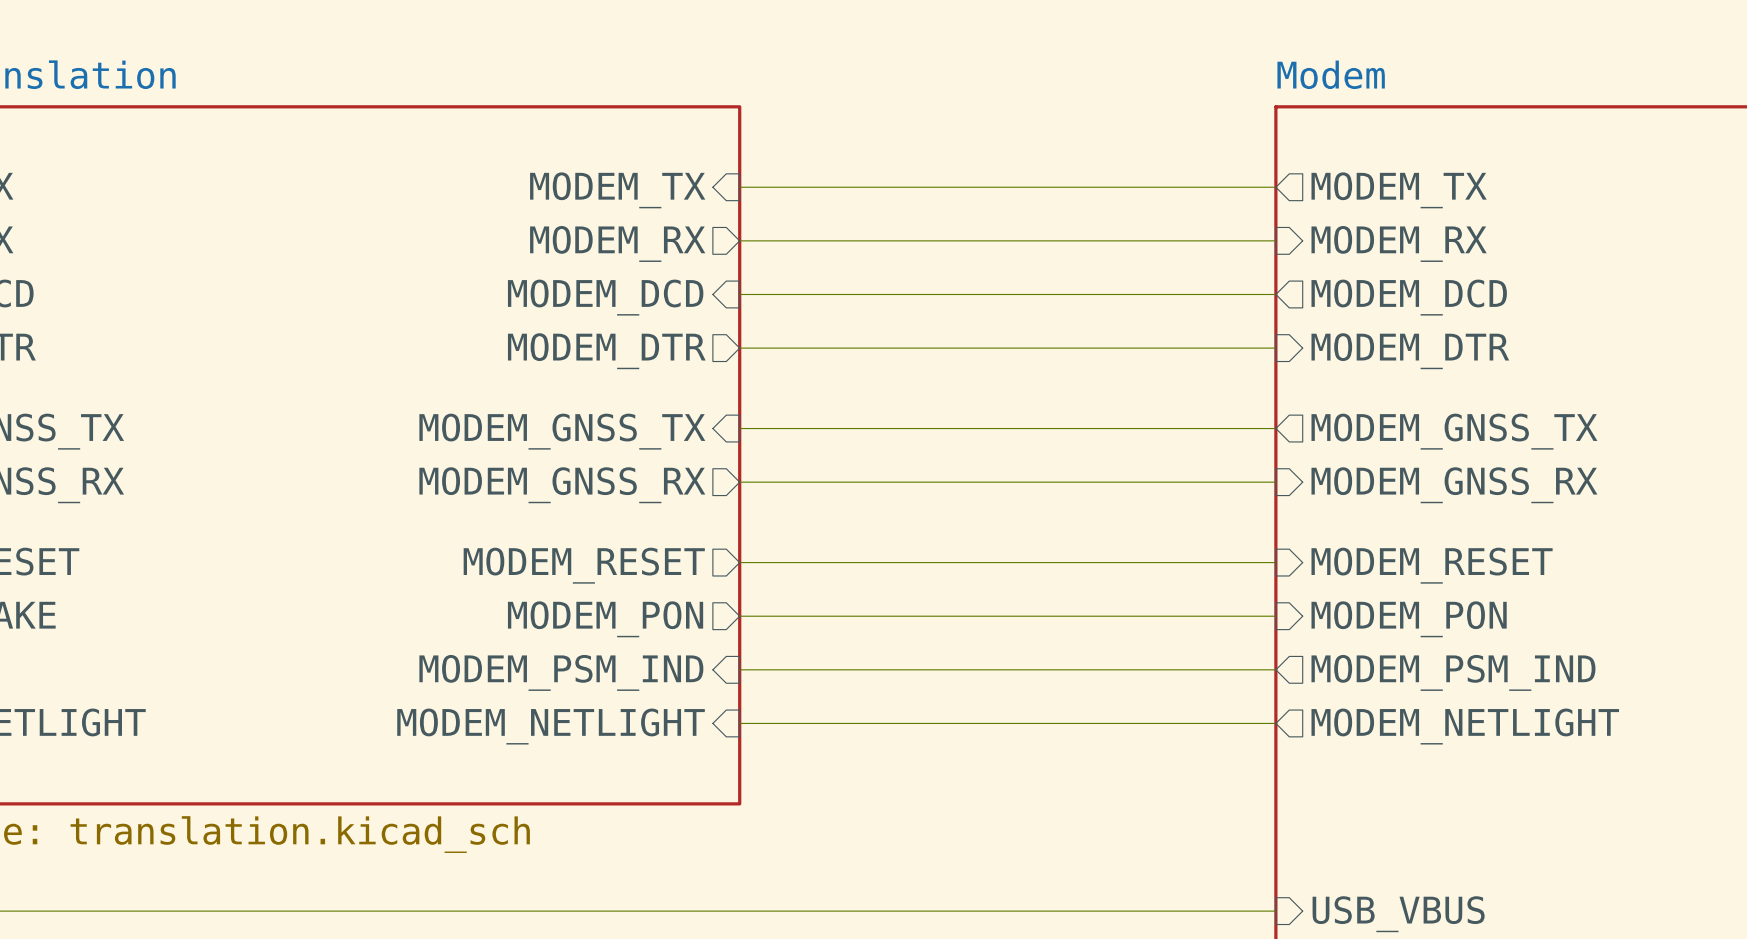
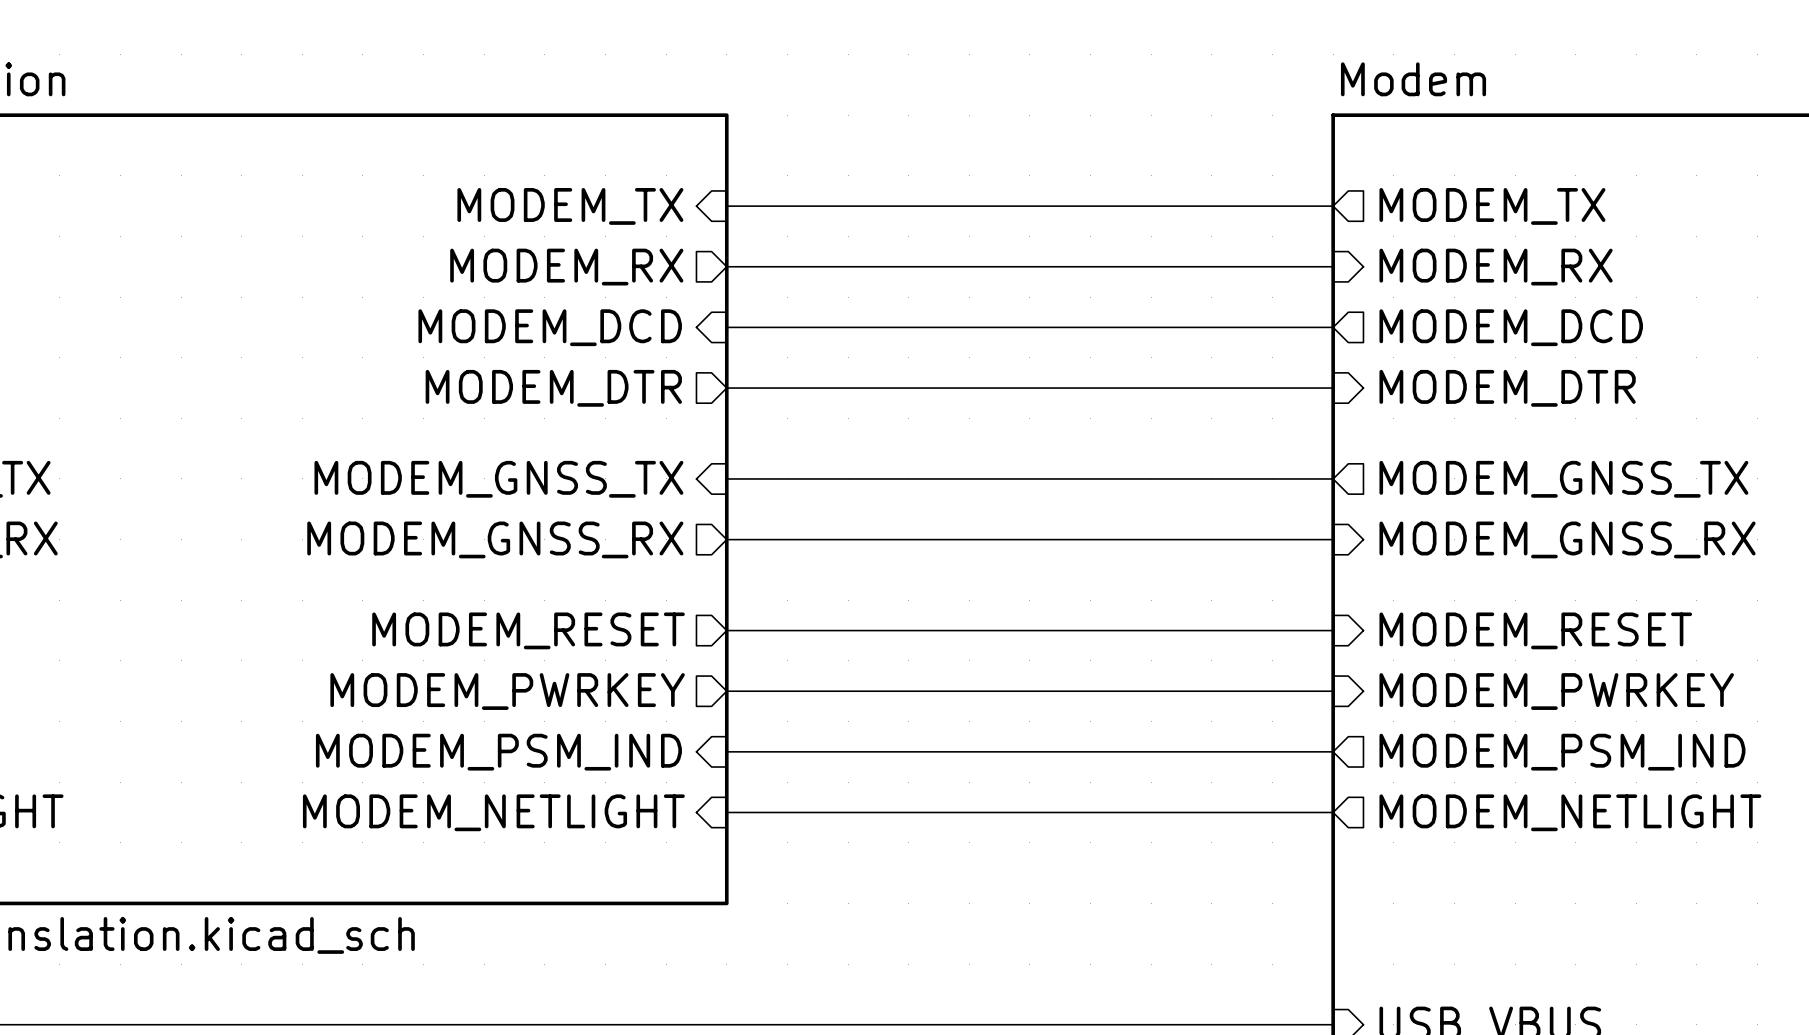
sheet pin: MODEM_PON (605, 619) -> MODEM_PWRKEY (507, 691)
sheet pin: MODEM_PON (1409, 619) -> MODEM_PWRKEY (1556, 691)

